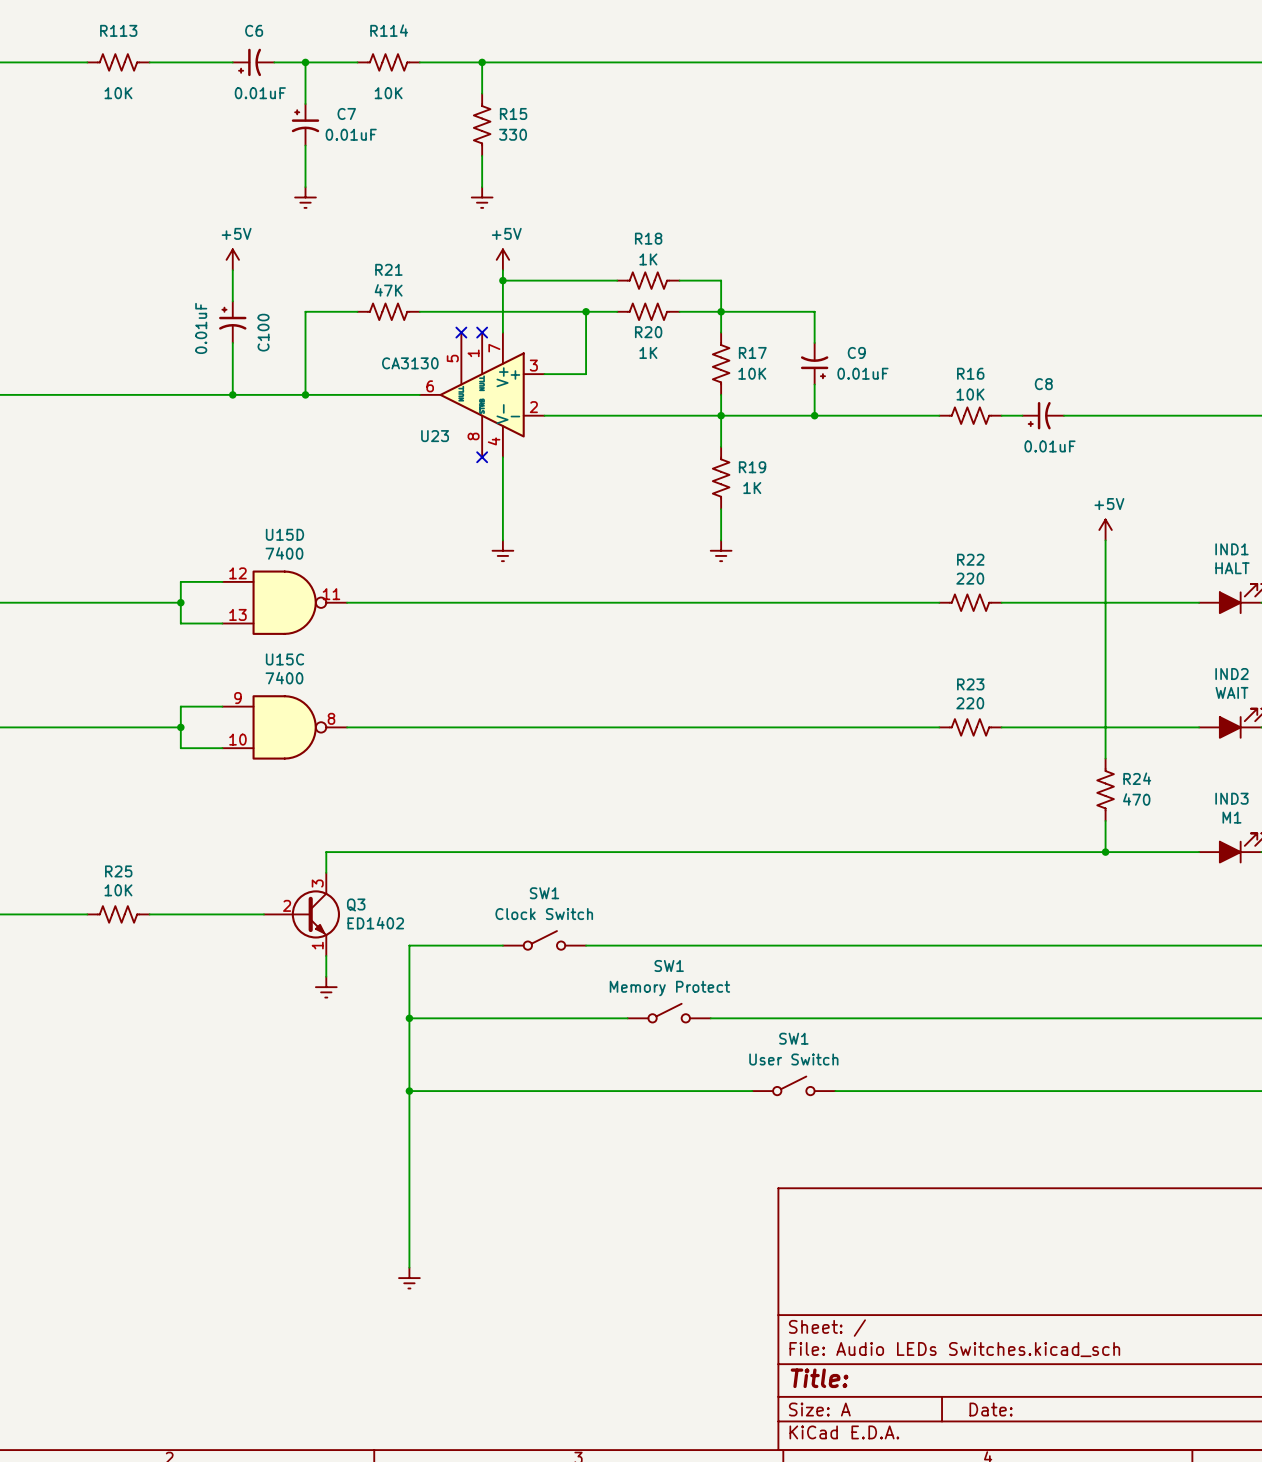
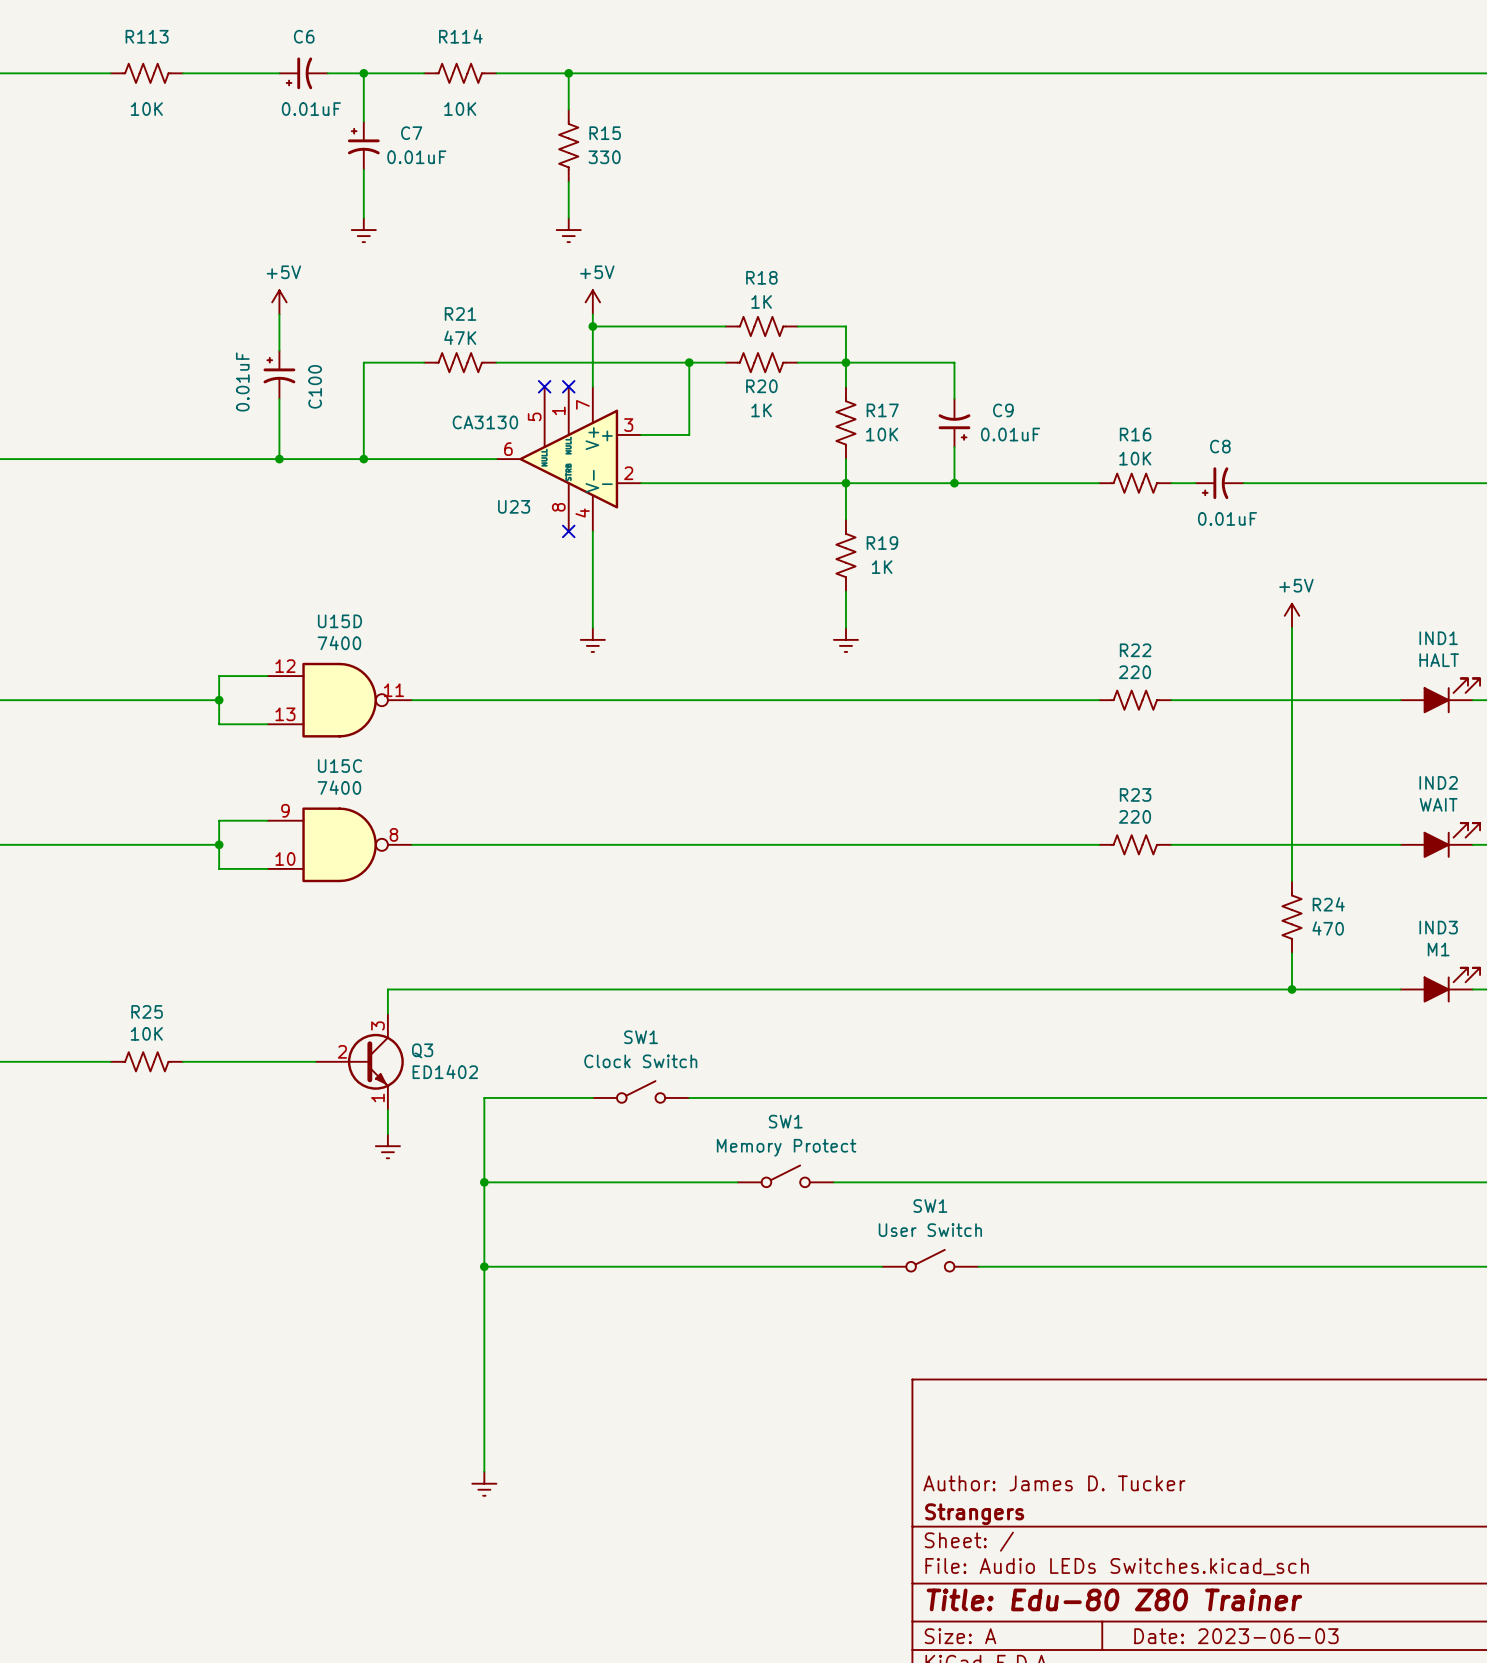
title block: none -> Author: James D. Tucker (1054, 1483)
title block: none -> Strangers (974, 1514)
title block: Title: (819, 1378) -> Title: Edu-80 Z80 Trainer (1114, 1599)
title block: Date: (991, 1409) -> Date: 2023-06-03 (1236, 1636)

